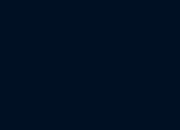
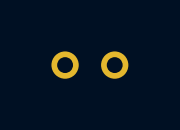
part: none -> (89, 65)

